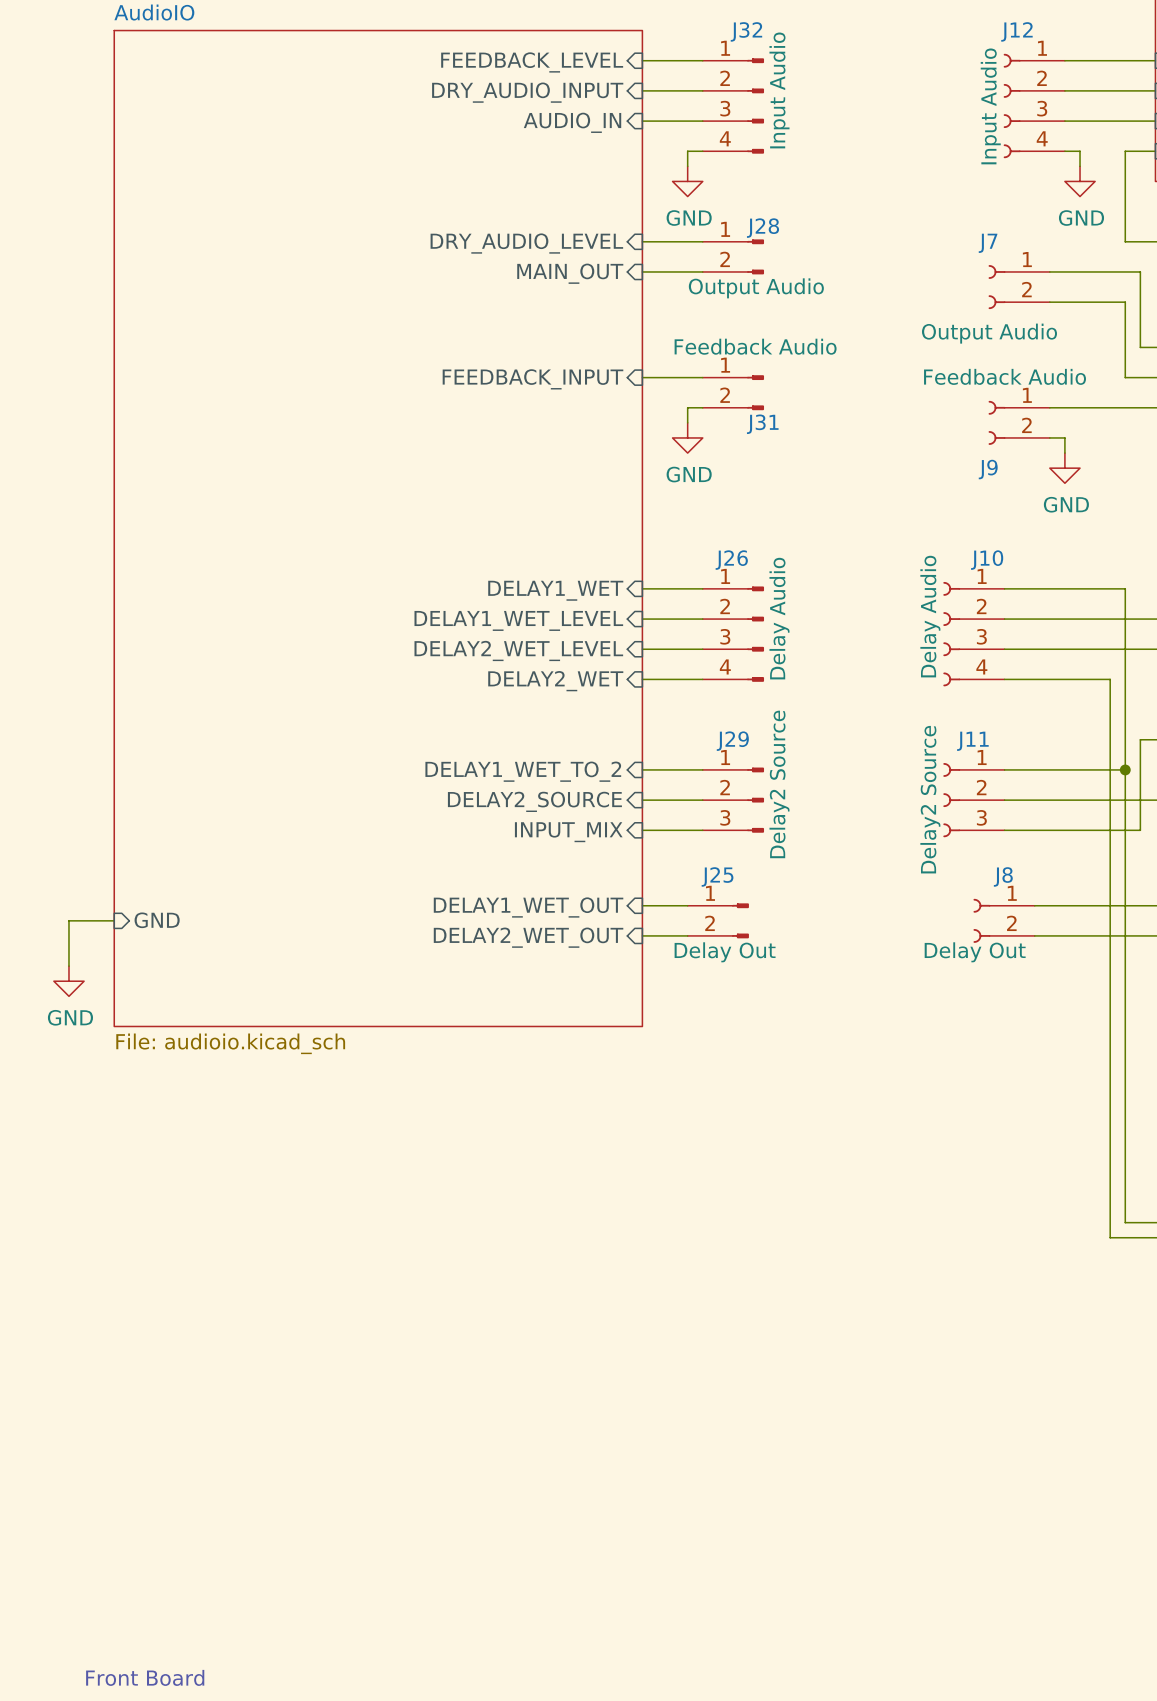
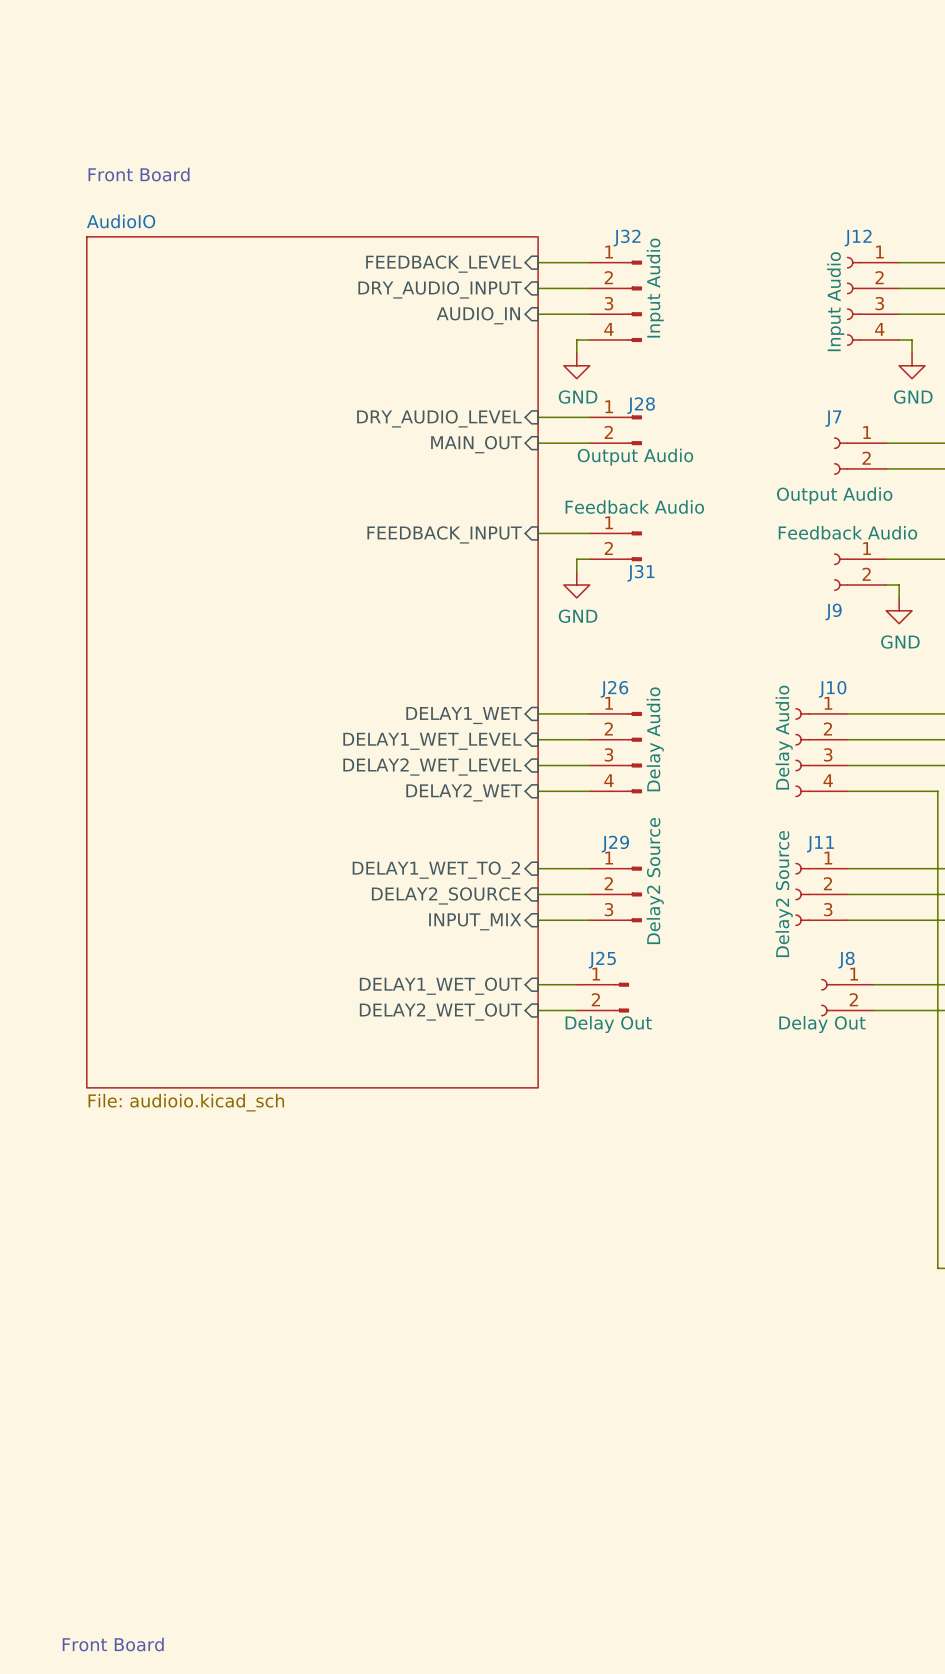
wire: (114, 920) (68, 920) (68, 966) -> none
sheet pin: GND (157, 920) -> none
power symbol: GND (68, 981) -> none

